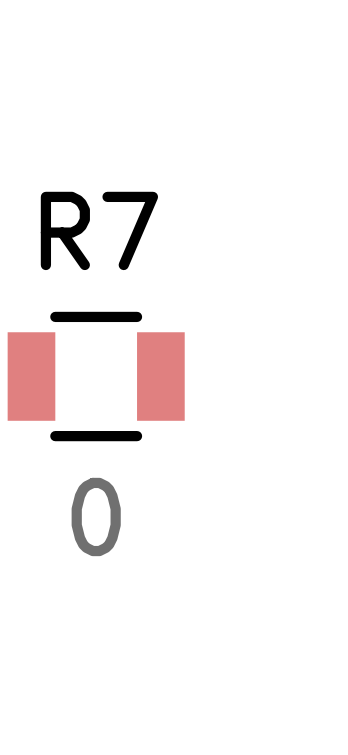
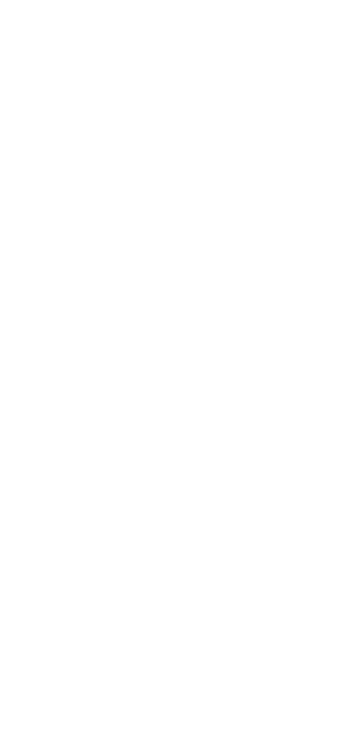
R7: 0 (96, 376) -> none

